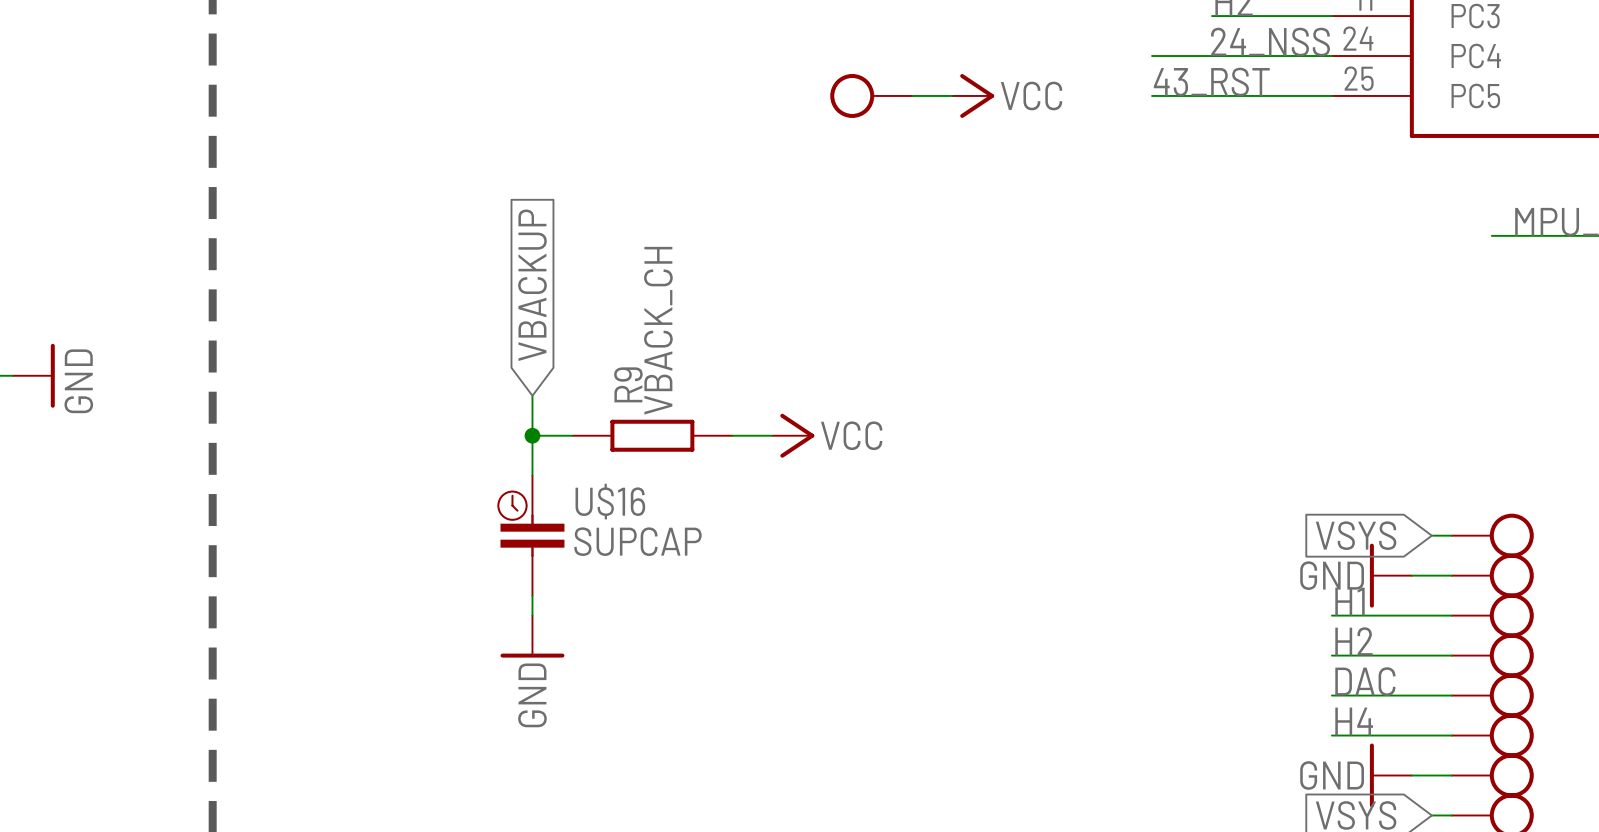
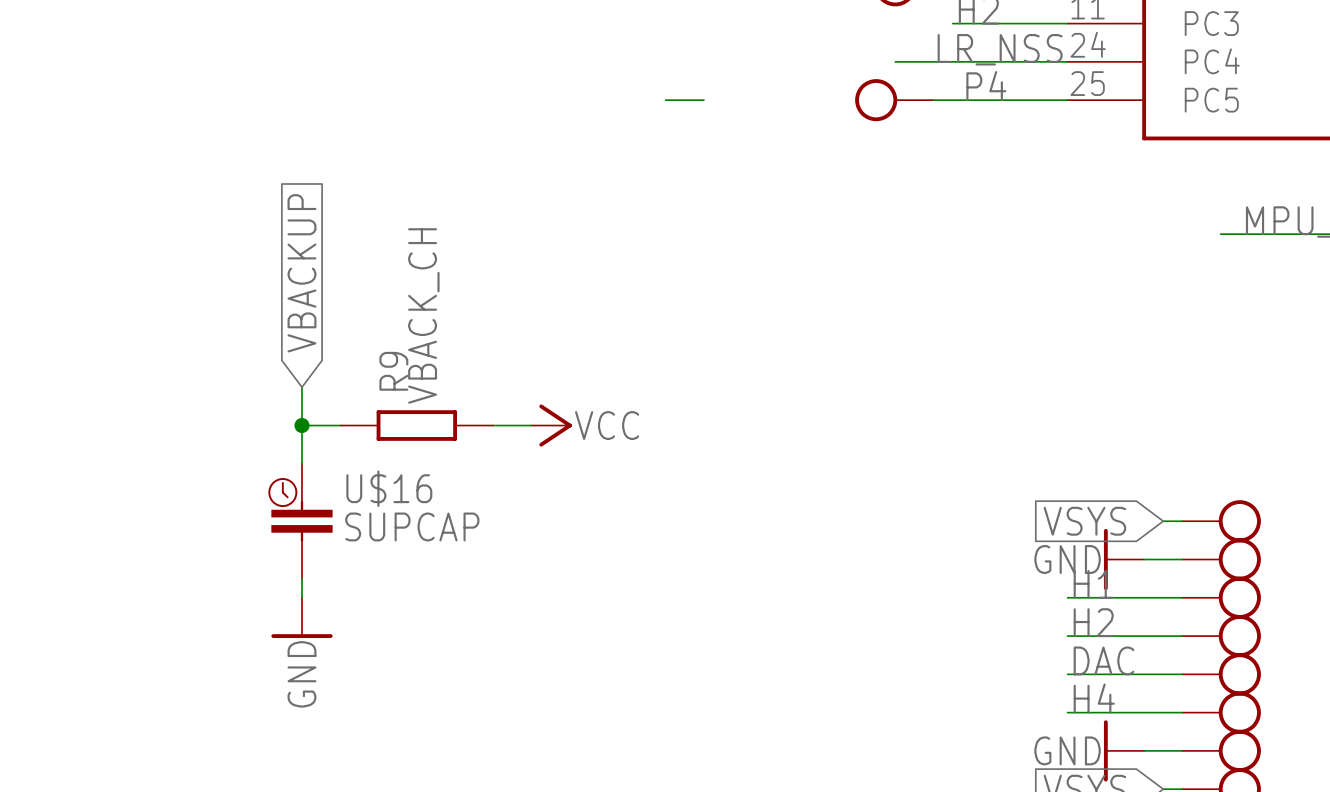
label: 24_NSS (1270, 42) -> LR_NSS (1000, 49)
label: 43_RST (1211, 81) -> none
label: none -> P4 (986, 86)
part position: (871, 95) -> (894, 100)
power symbol: VCC (973, 95) -> none

